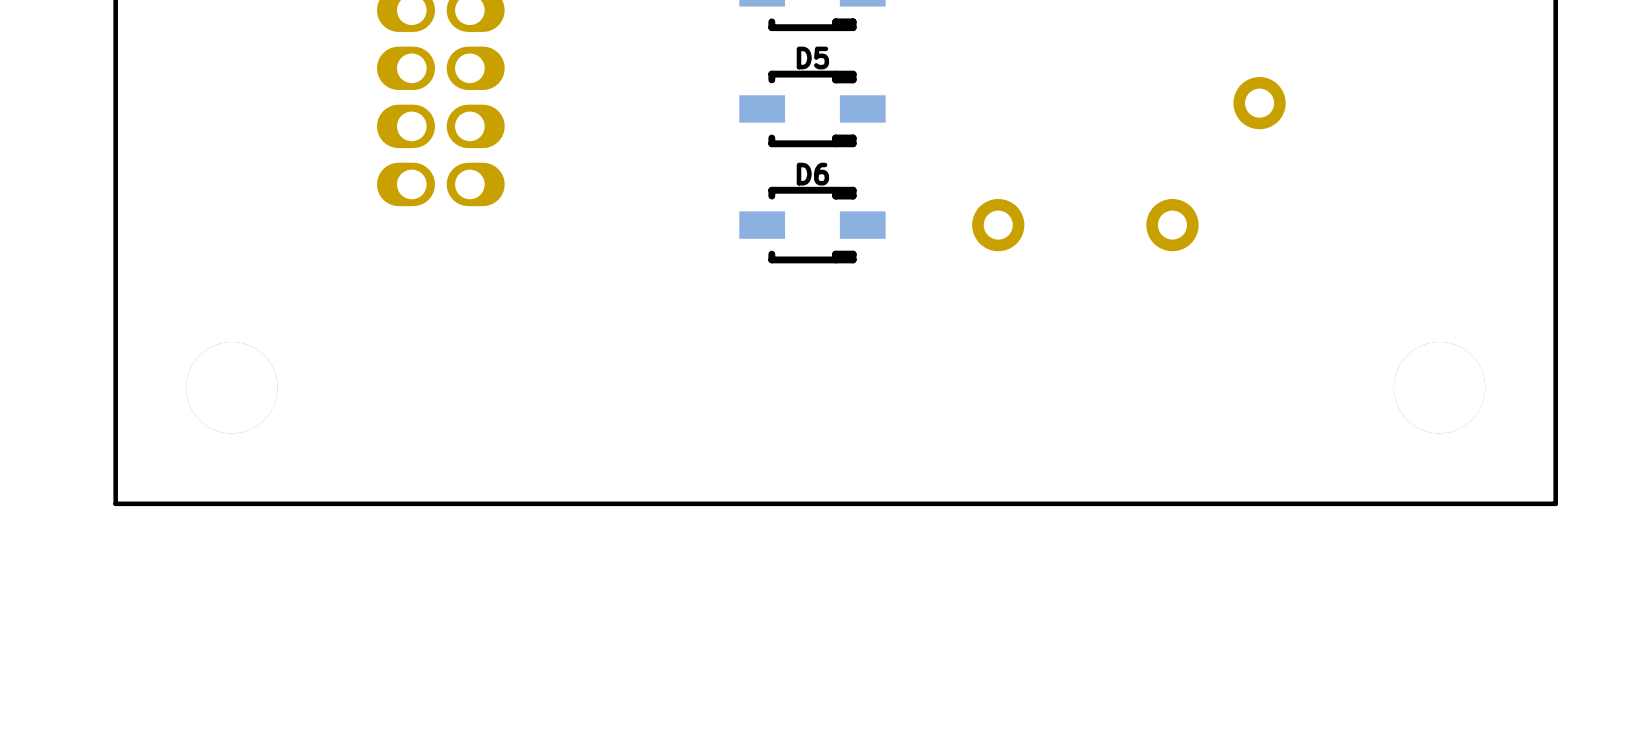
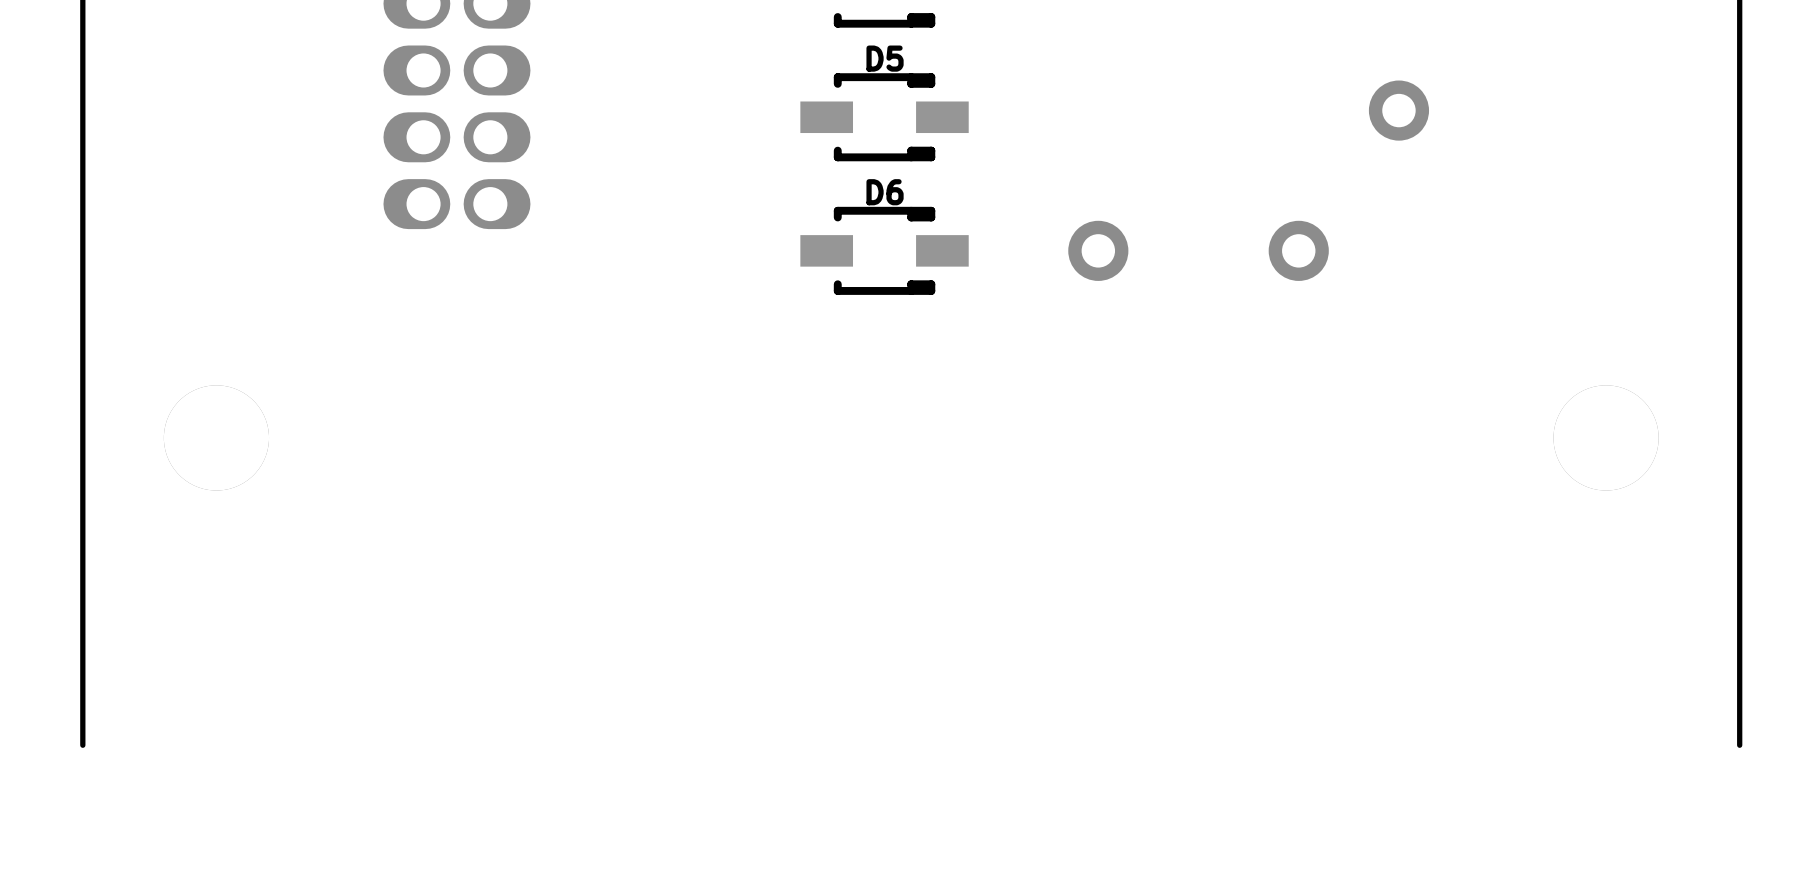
board edge: none -> (82, 571) (82, 745)
board edge: (1555, 503) (115, 503) -> (1739, 571) (1739, 745)

